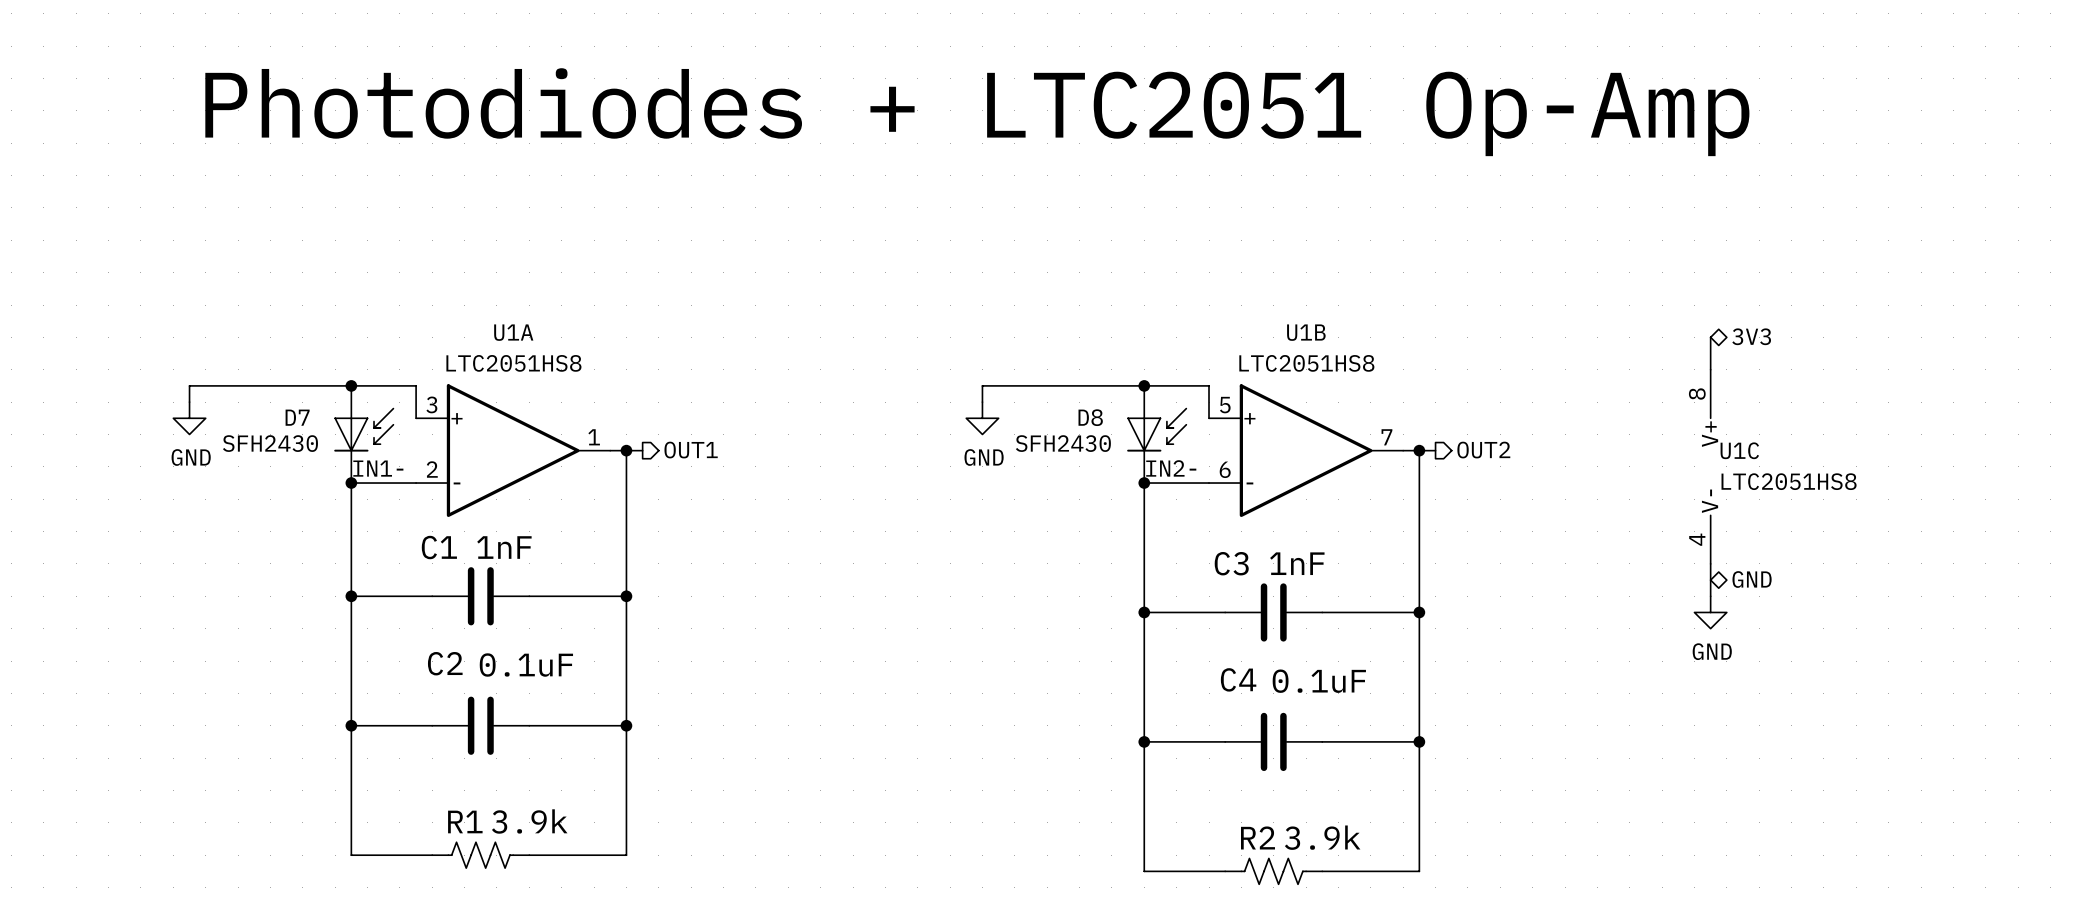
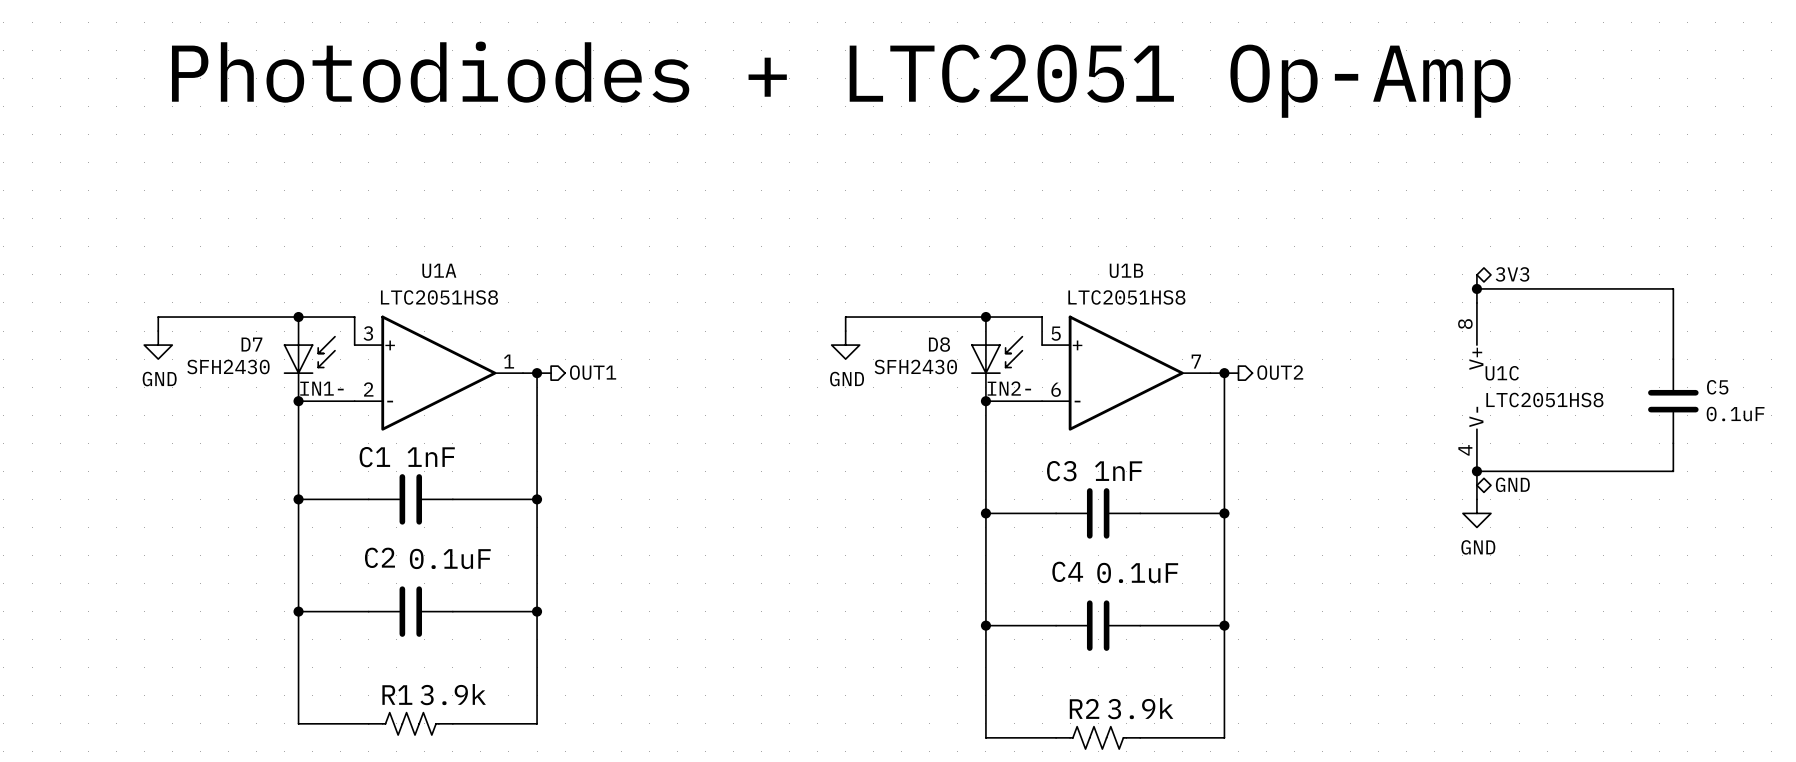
wire: none -> (1476, 288) (1673, 288) (1673, 359)
junction: none -> (1476, 288)
C5: none -> 0.1uF (1673, 401)
wire: none -> (1673, 443) (1673, 471) (1476, 471)
junction: none -> (1476, 471)

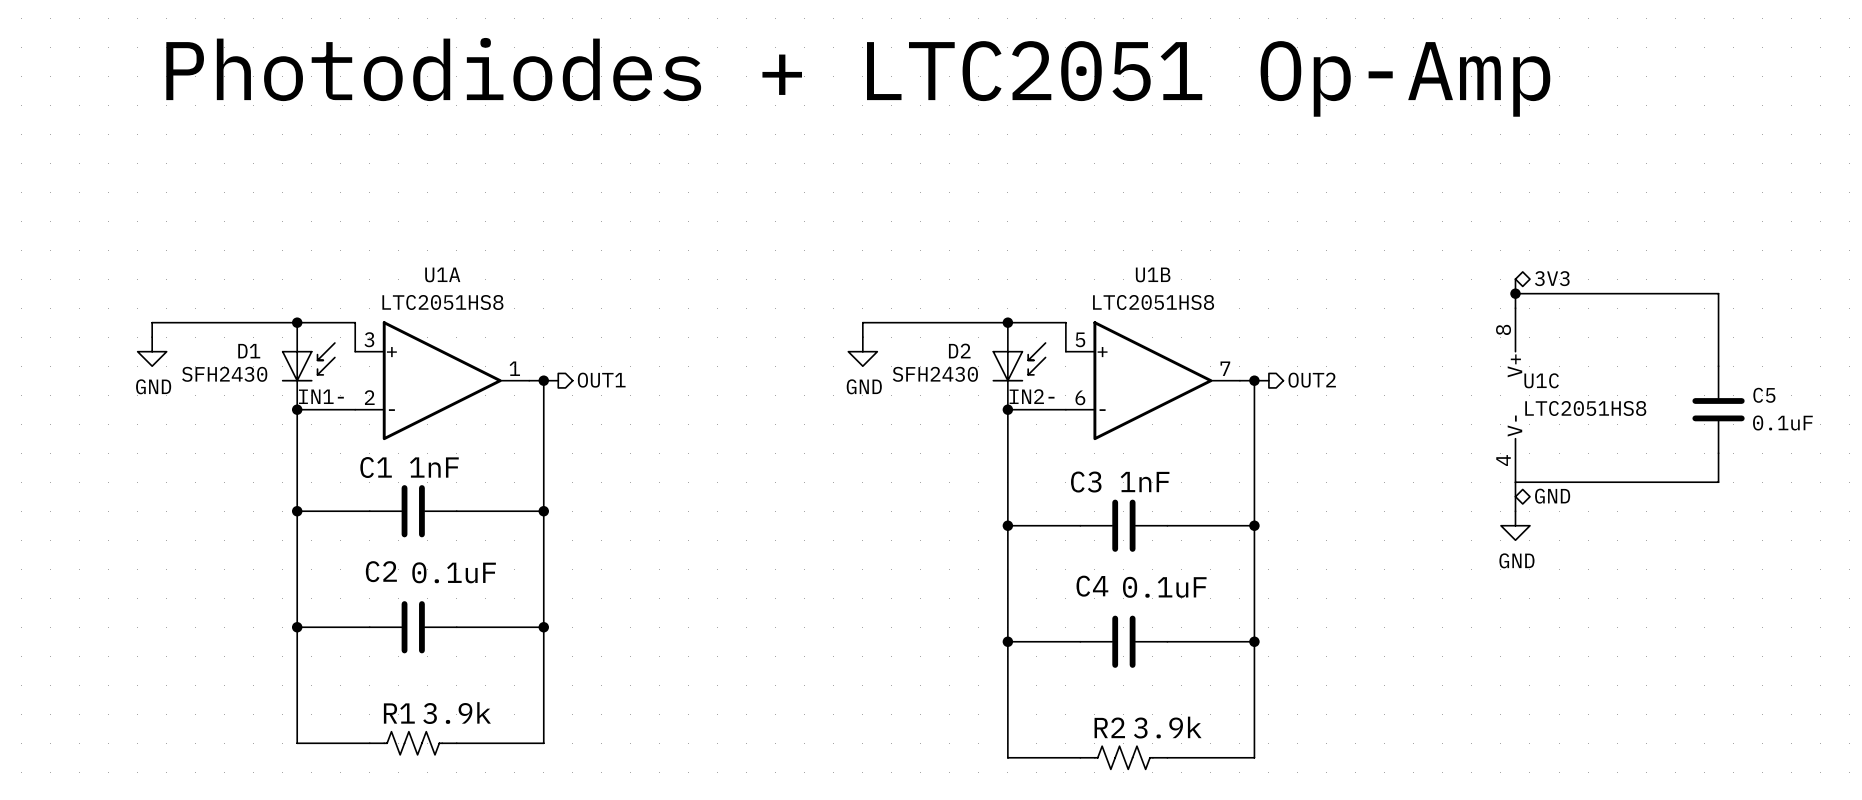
D7 name: D7 (251, 344) -> D1 (249, 351)
D8 name: D8 (939, 344) -> D2 (959, 351)
junction: (1476, 471) -> none

